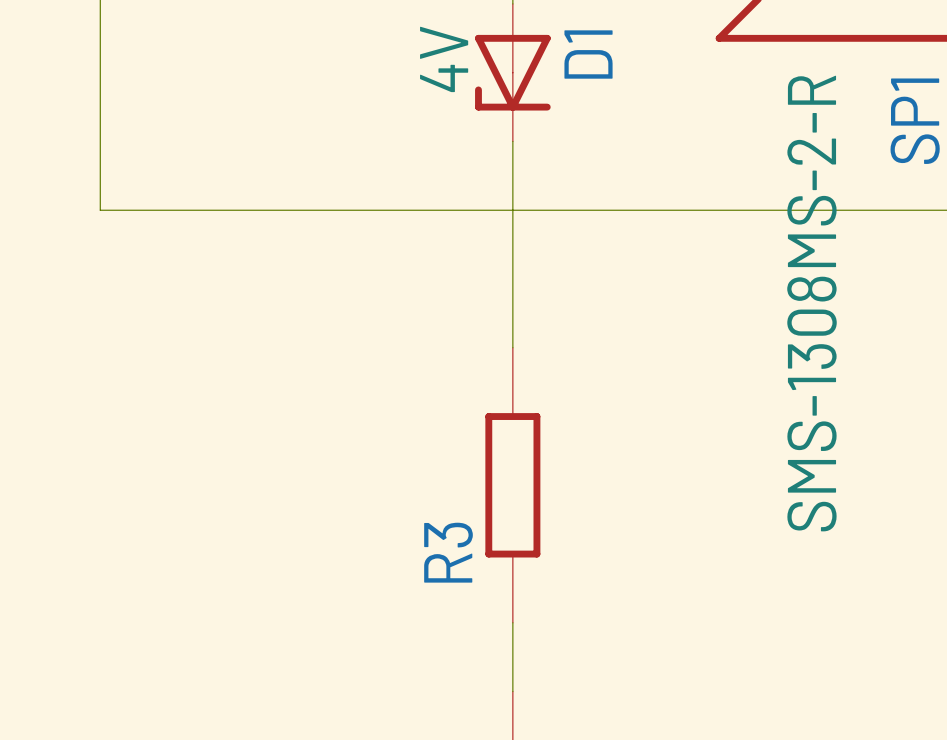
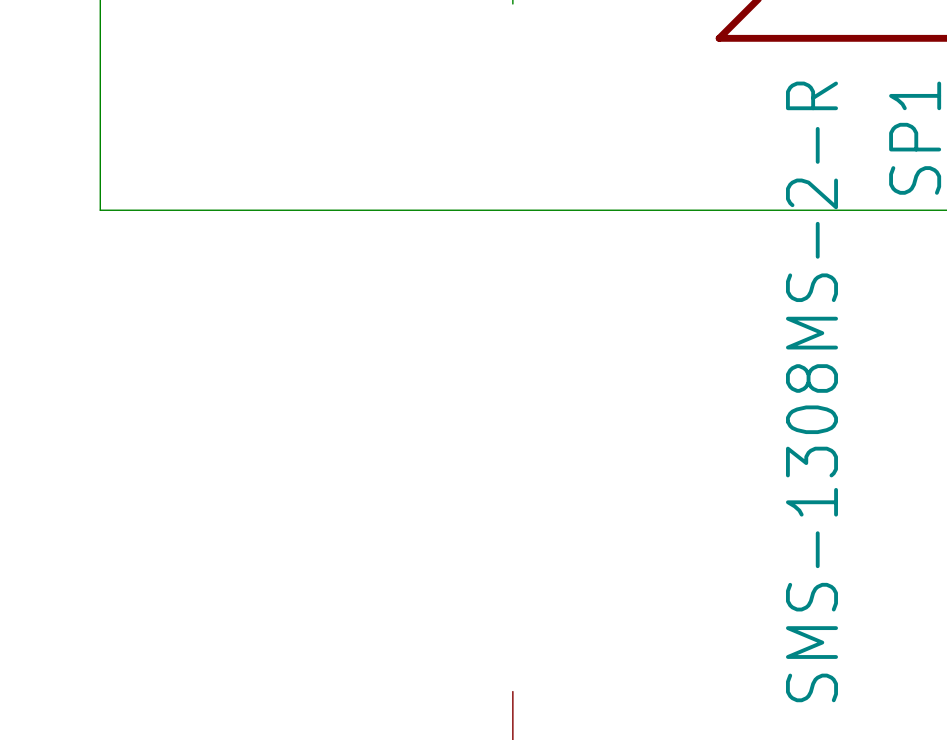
D1: 4V (512, 72) -> none
wire: (512, 141) (512, 347) -> none
R3: (512, 485) -> none
wire: (512, 622) (512, 691) -> none

